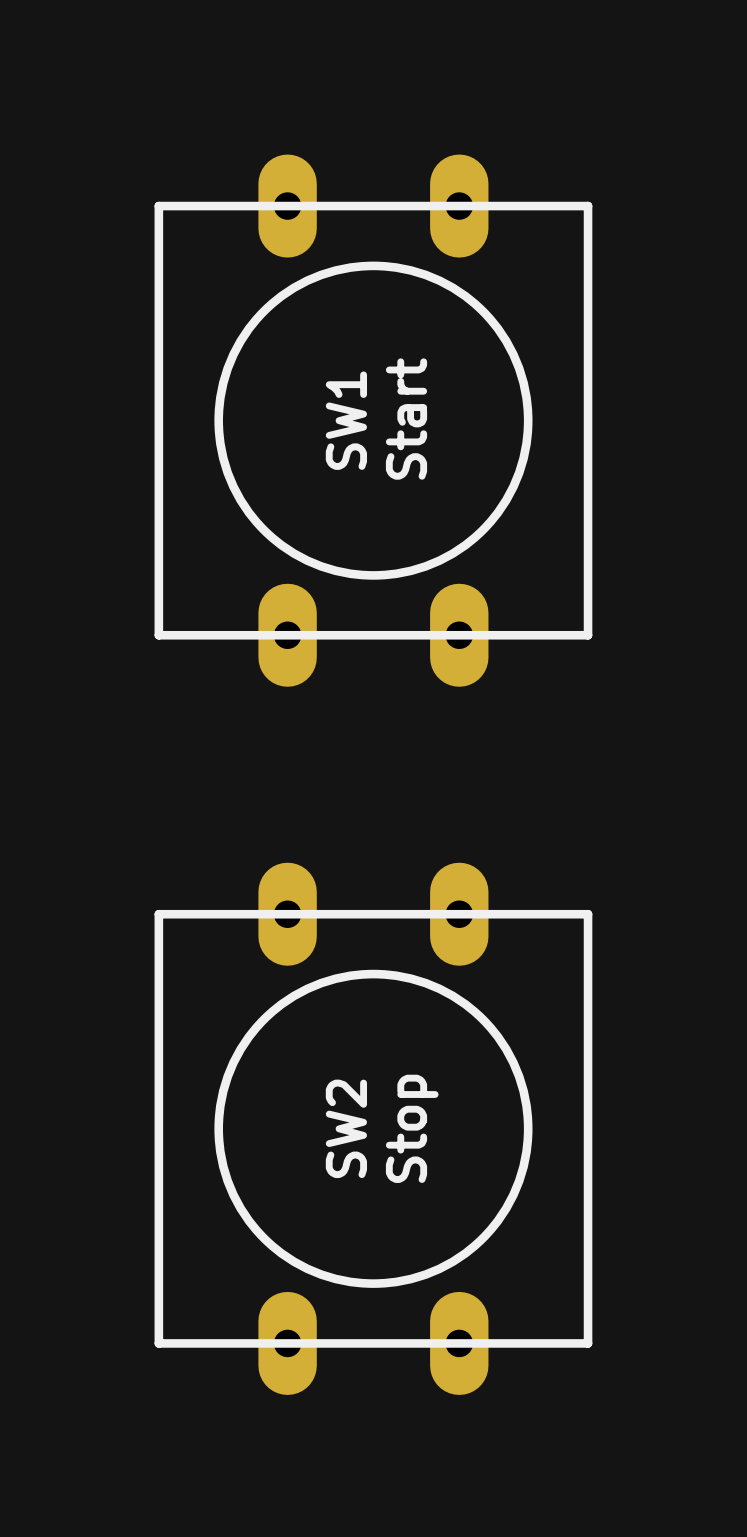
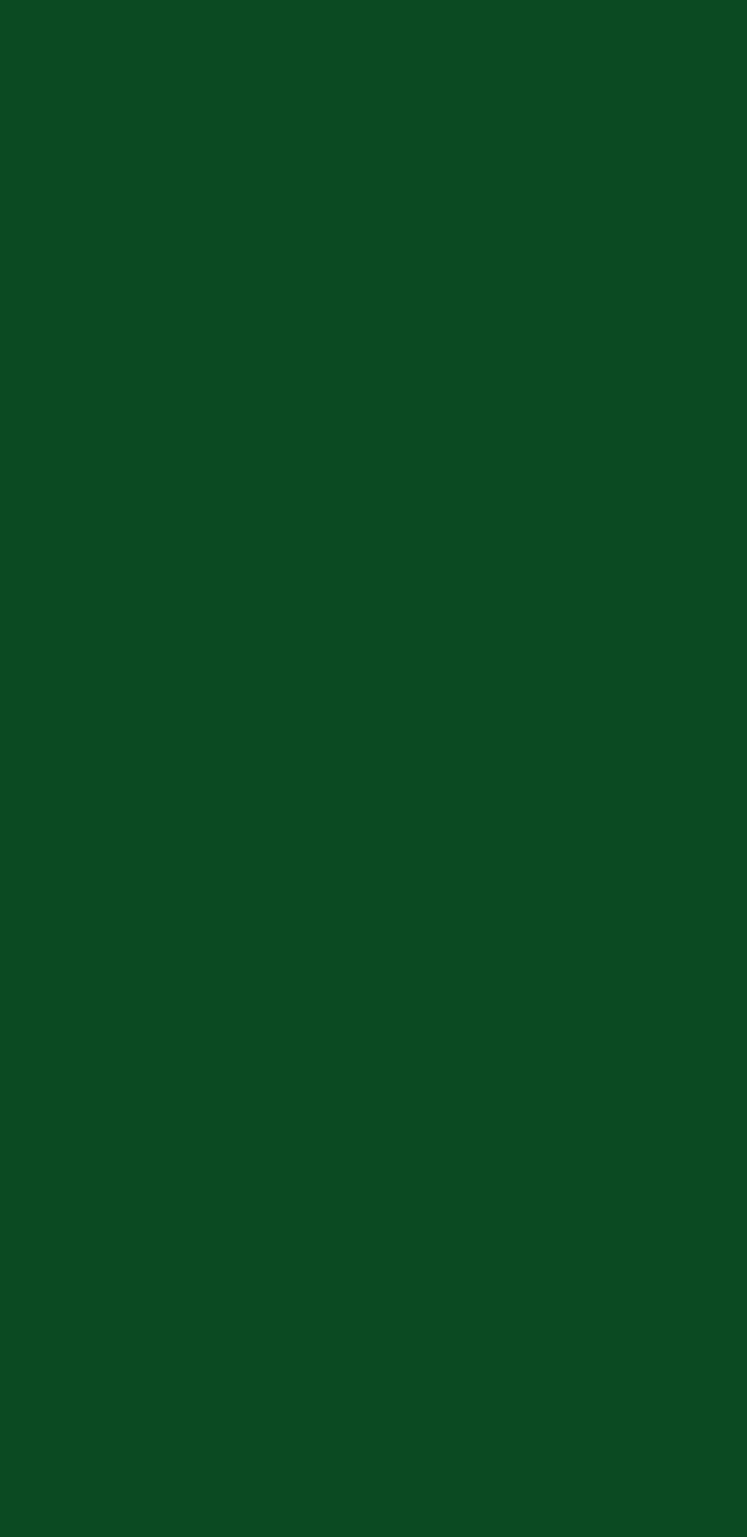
SW1: Start (373, 420) -> none
SW2: Stop (373, 1128) -> none

